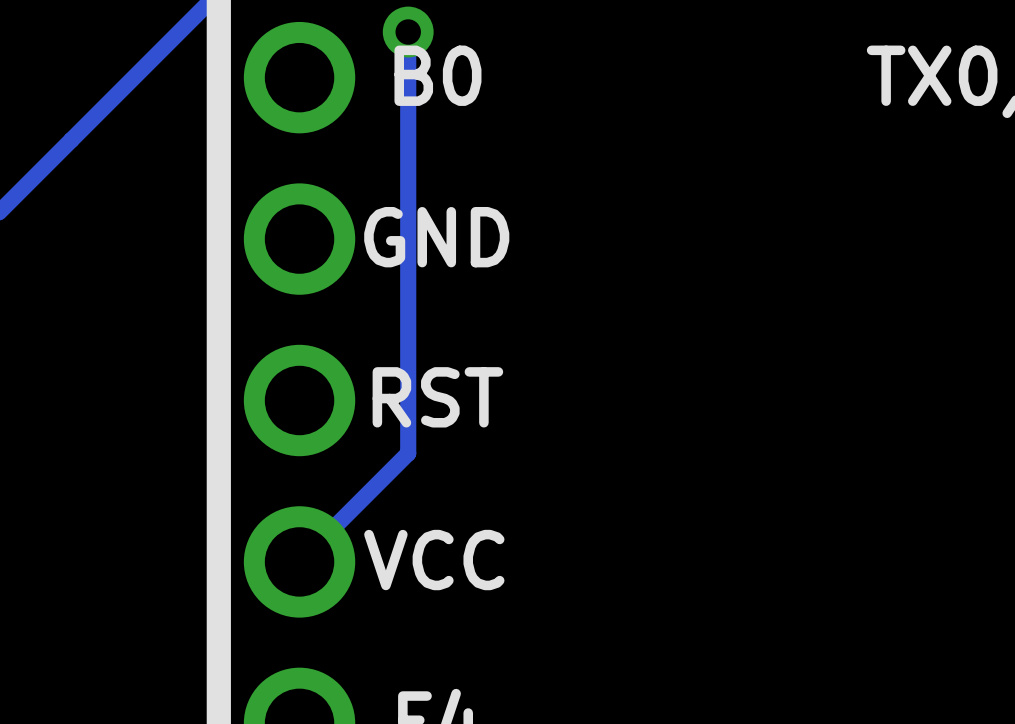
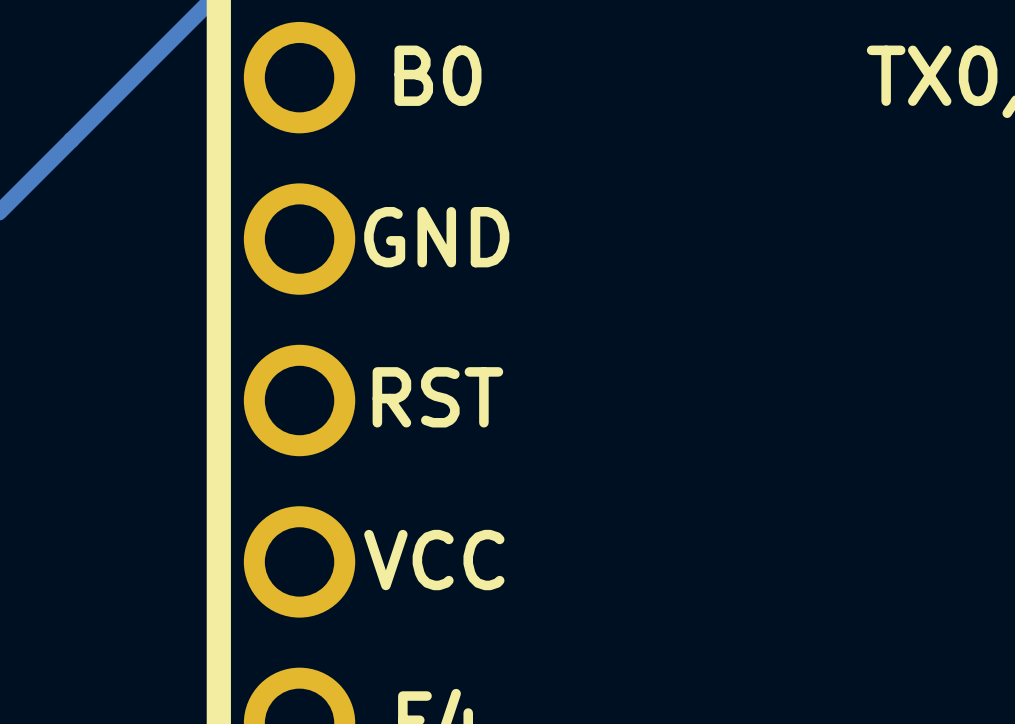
track: (408, 32) (408, 453) (299, 562) -> none
via: (408, 32) -> none

